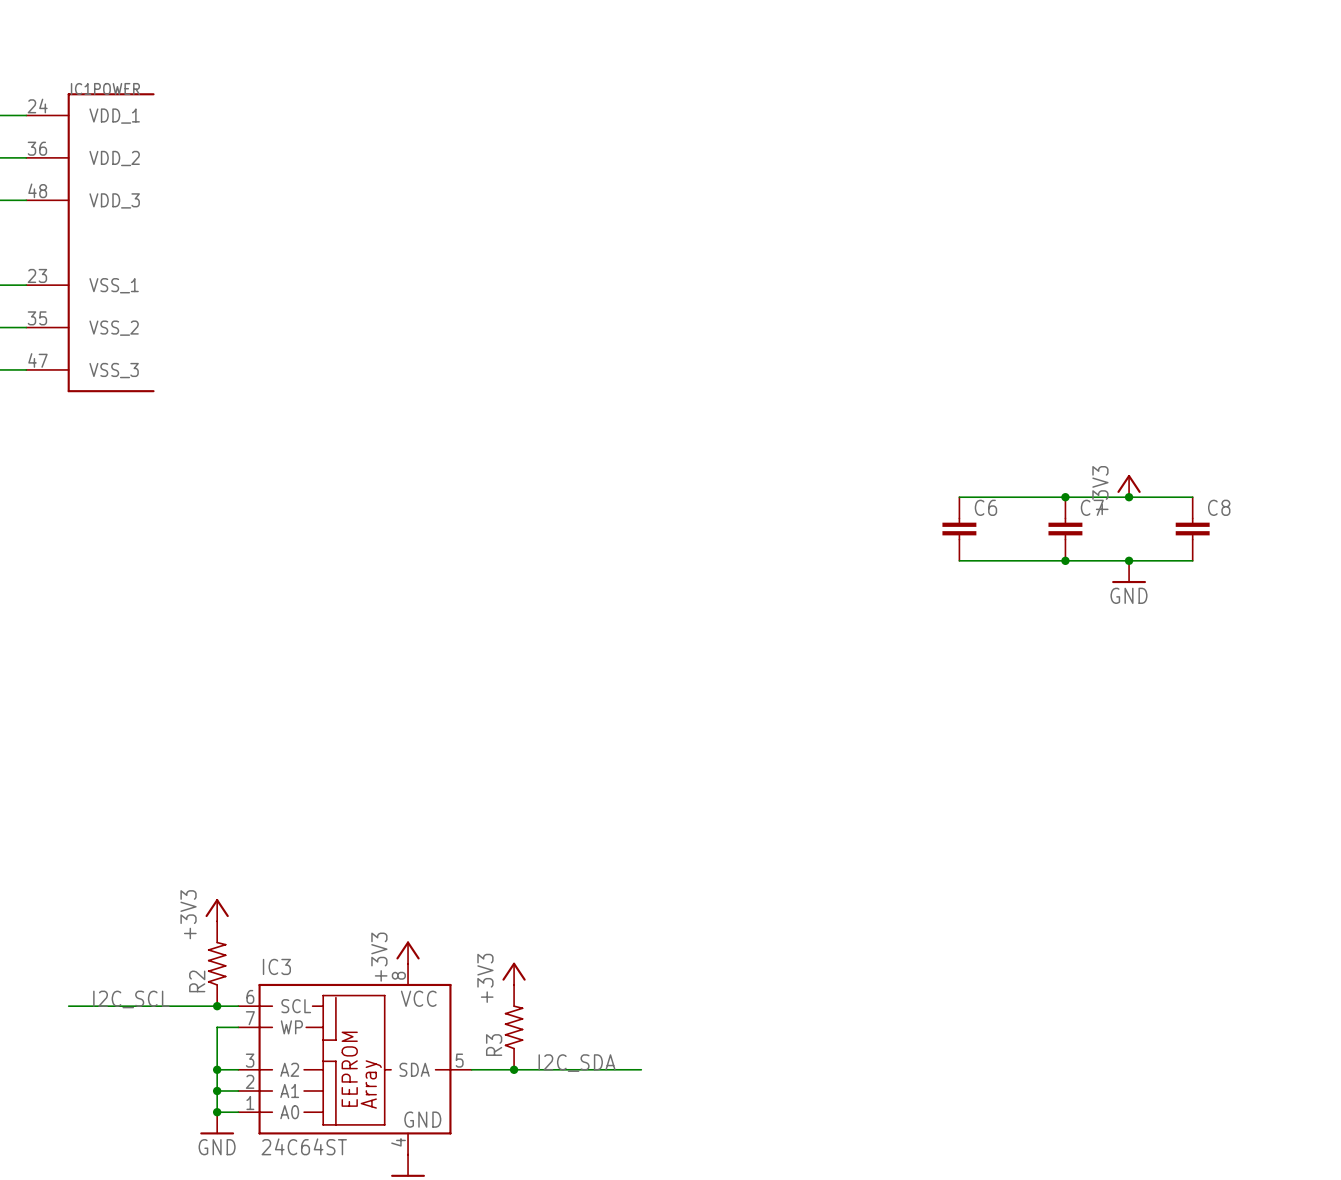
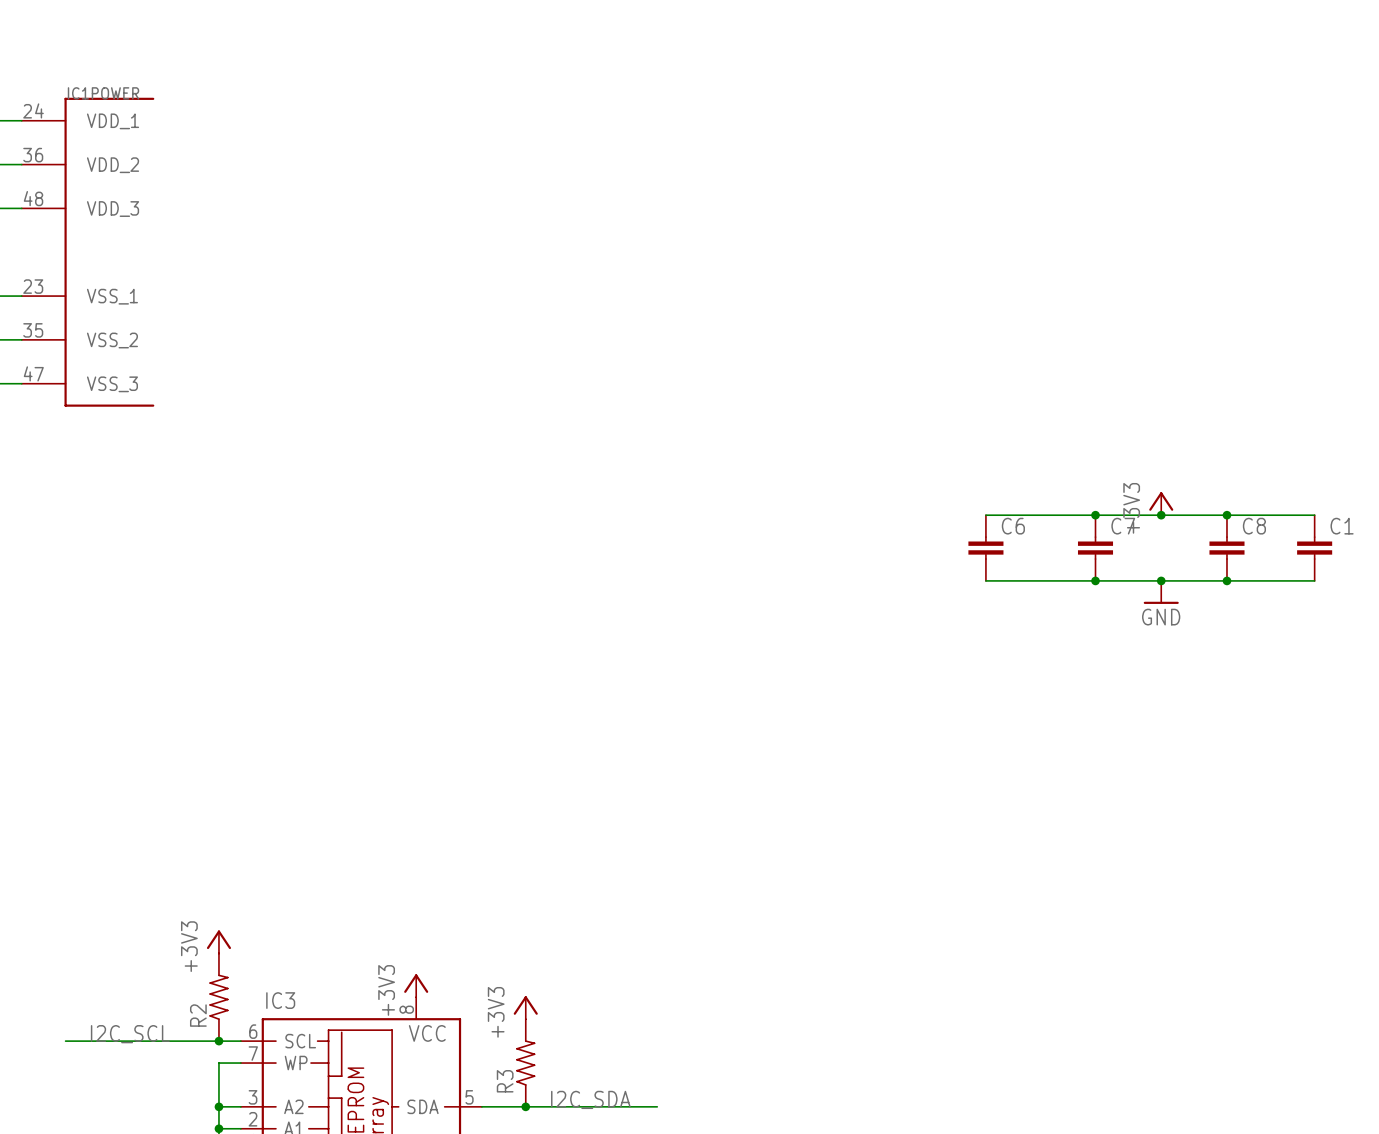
wire: none -> (1226, 515) (1314, 515)
junction: none -> (1226, 515)
C1: none -> (1314, 548)
wire: none -> (1226, 580) (1314, 580)
junction: none -> (1226, 580)

